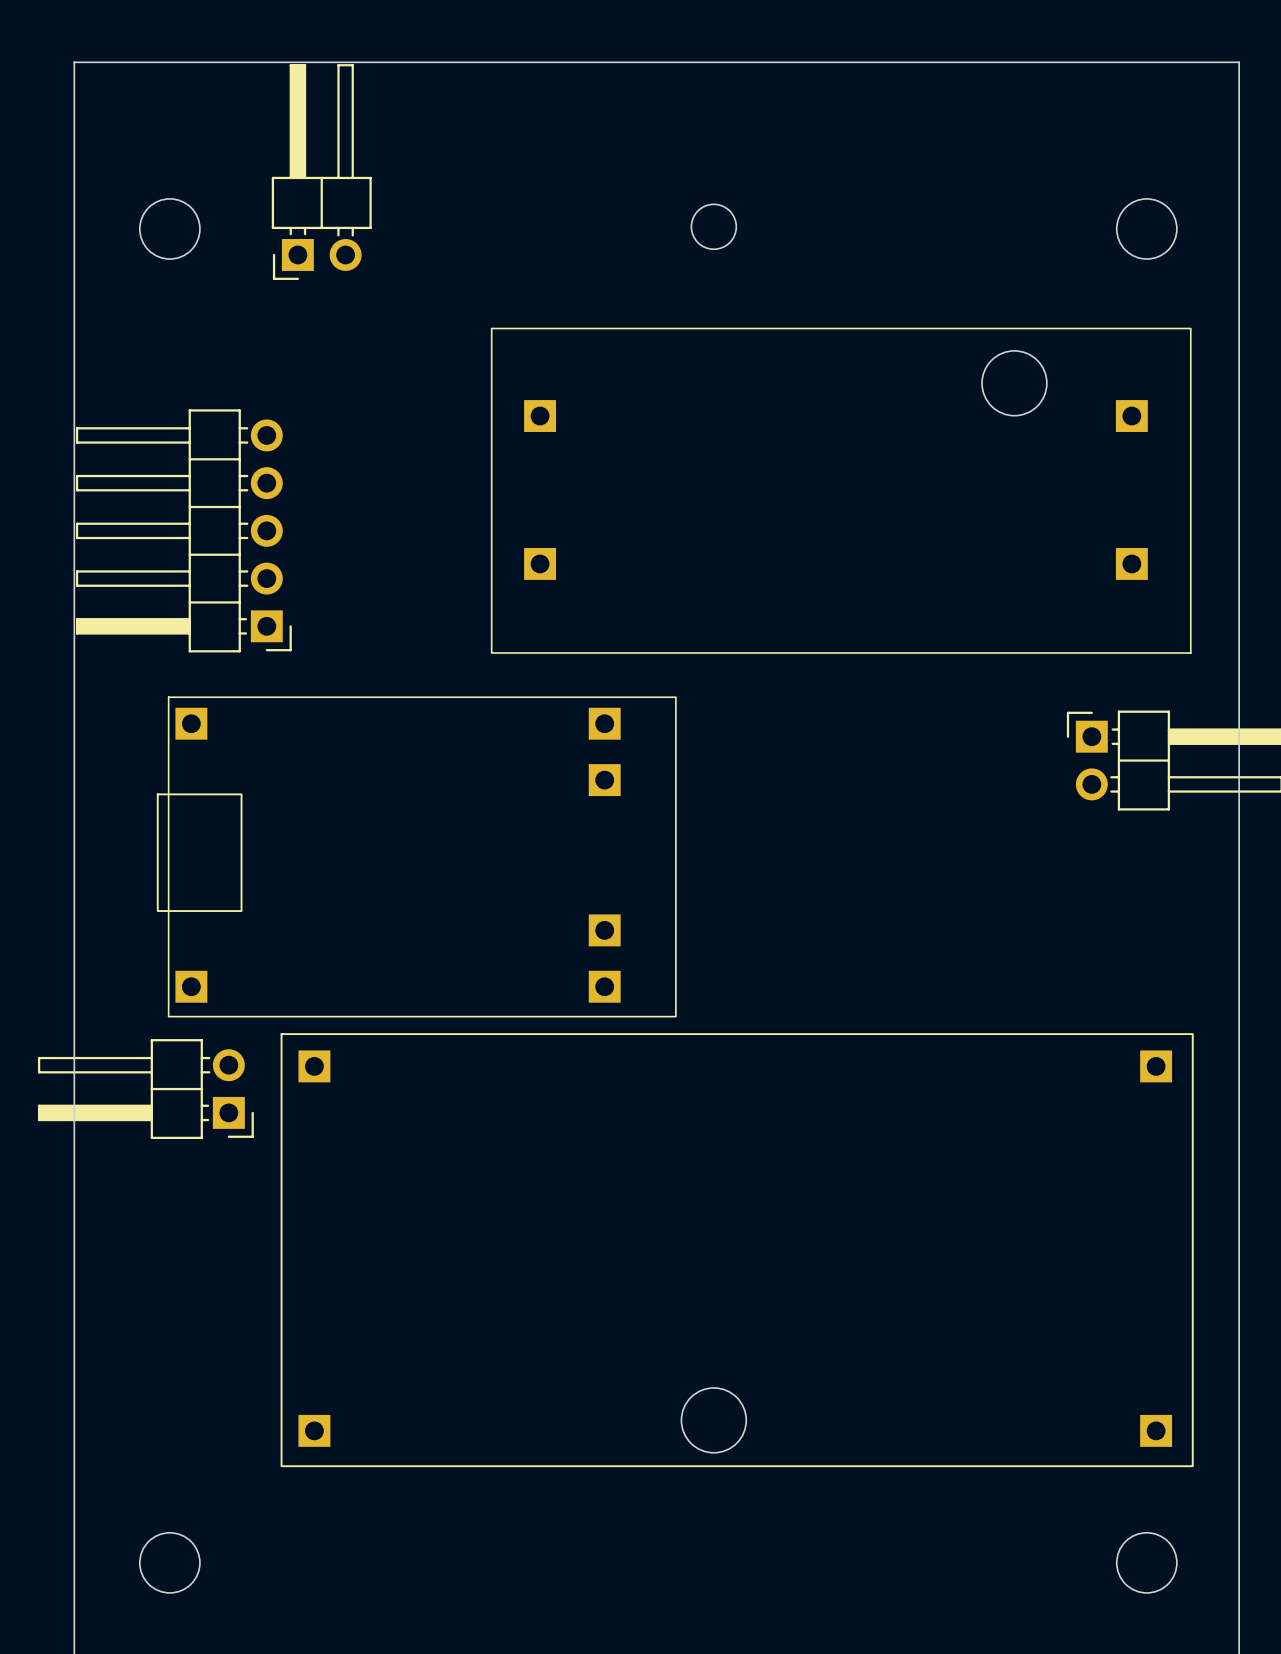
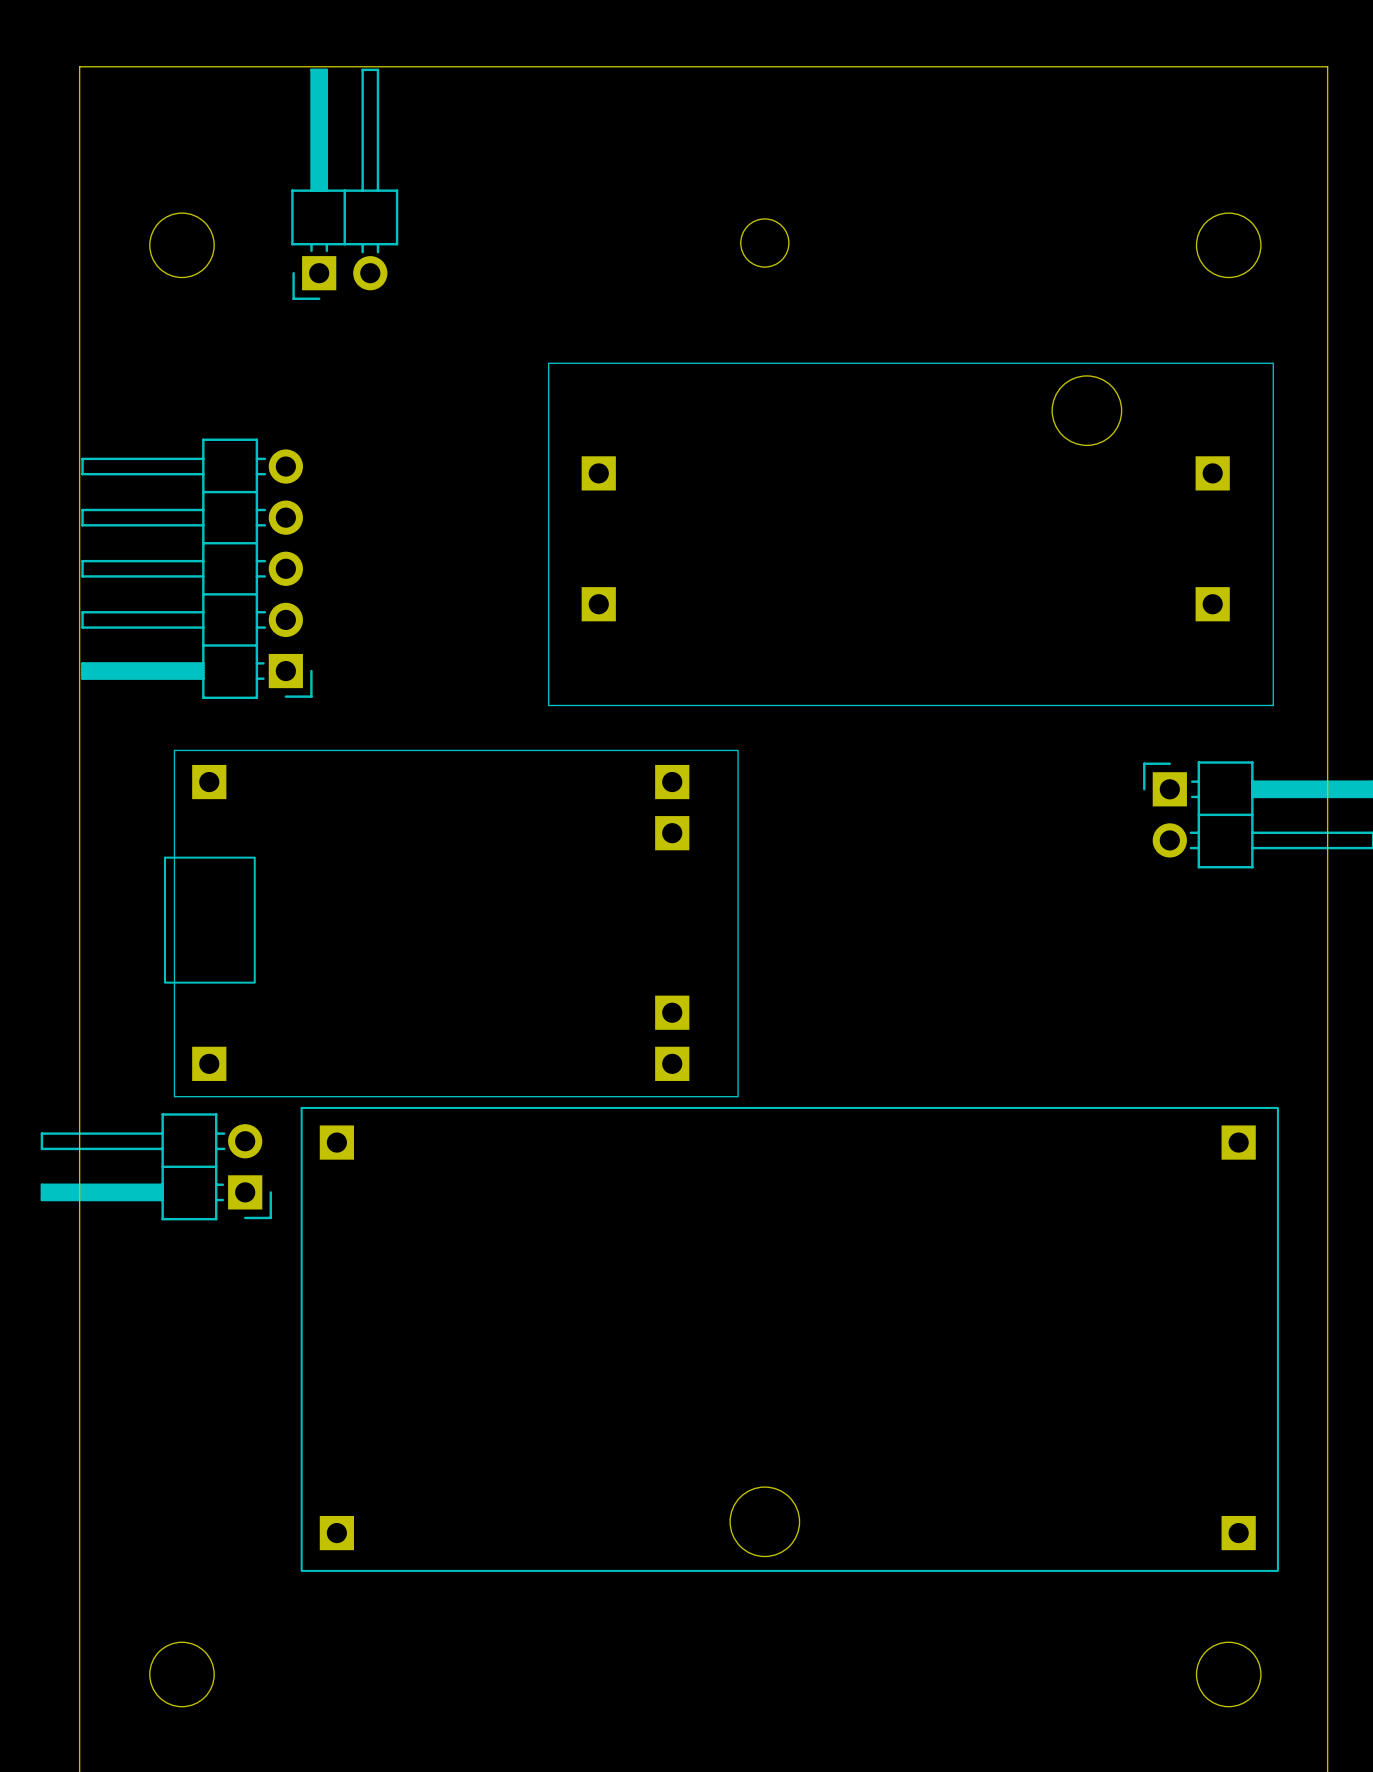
part footprint: [491, 328, 1192, 654] -> [548, 362, 1274, 706]
part footprint: [156, 696, 677, 1018] -> [163, 749, 739, 1098]

